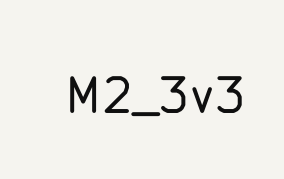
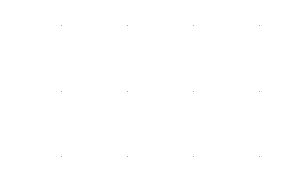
label: M2_3v3 (155, 96) -> none

